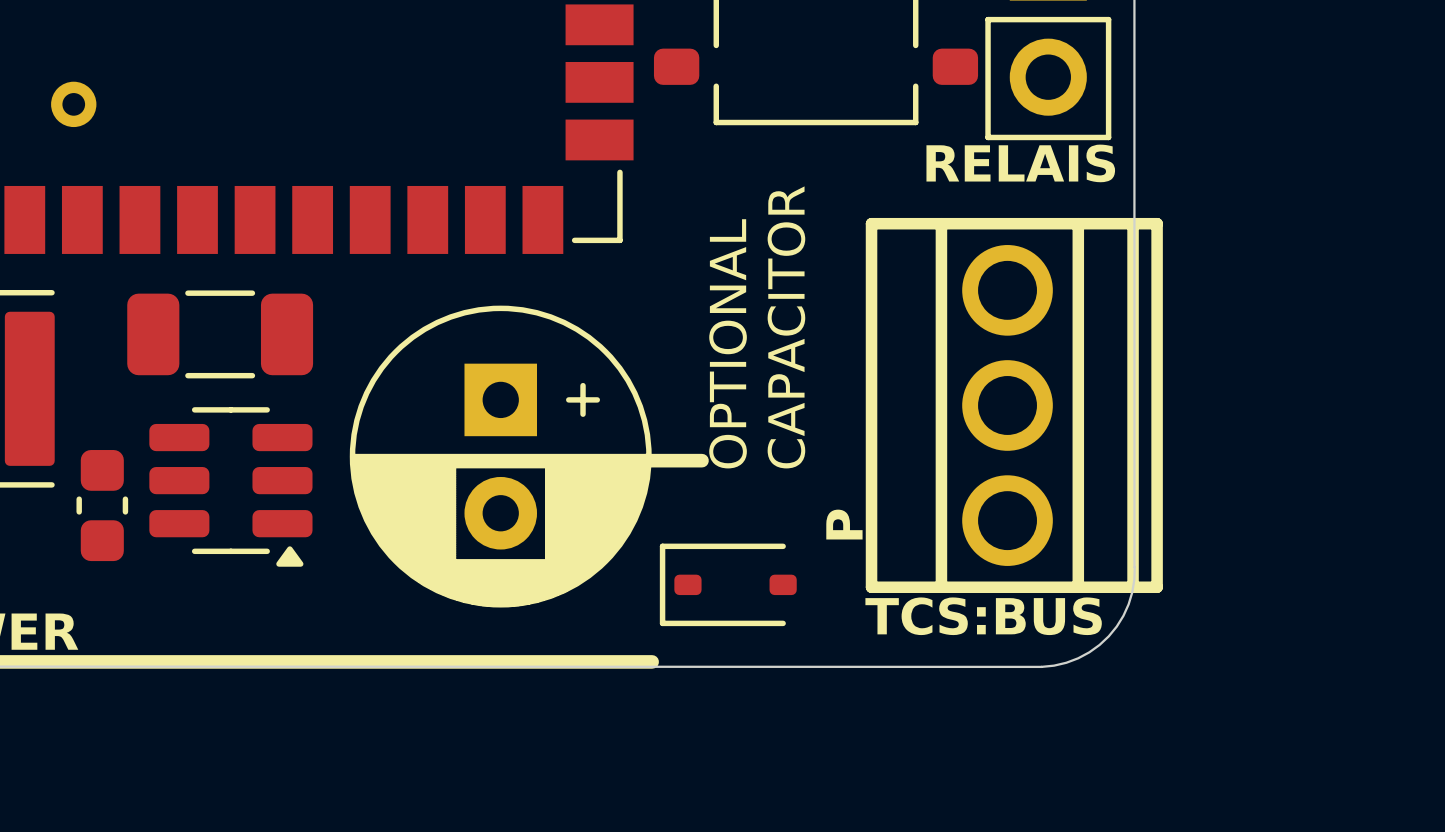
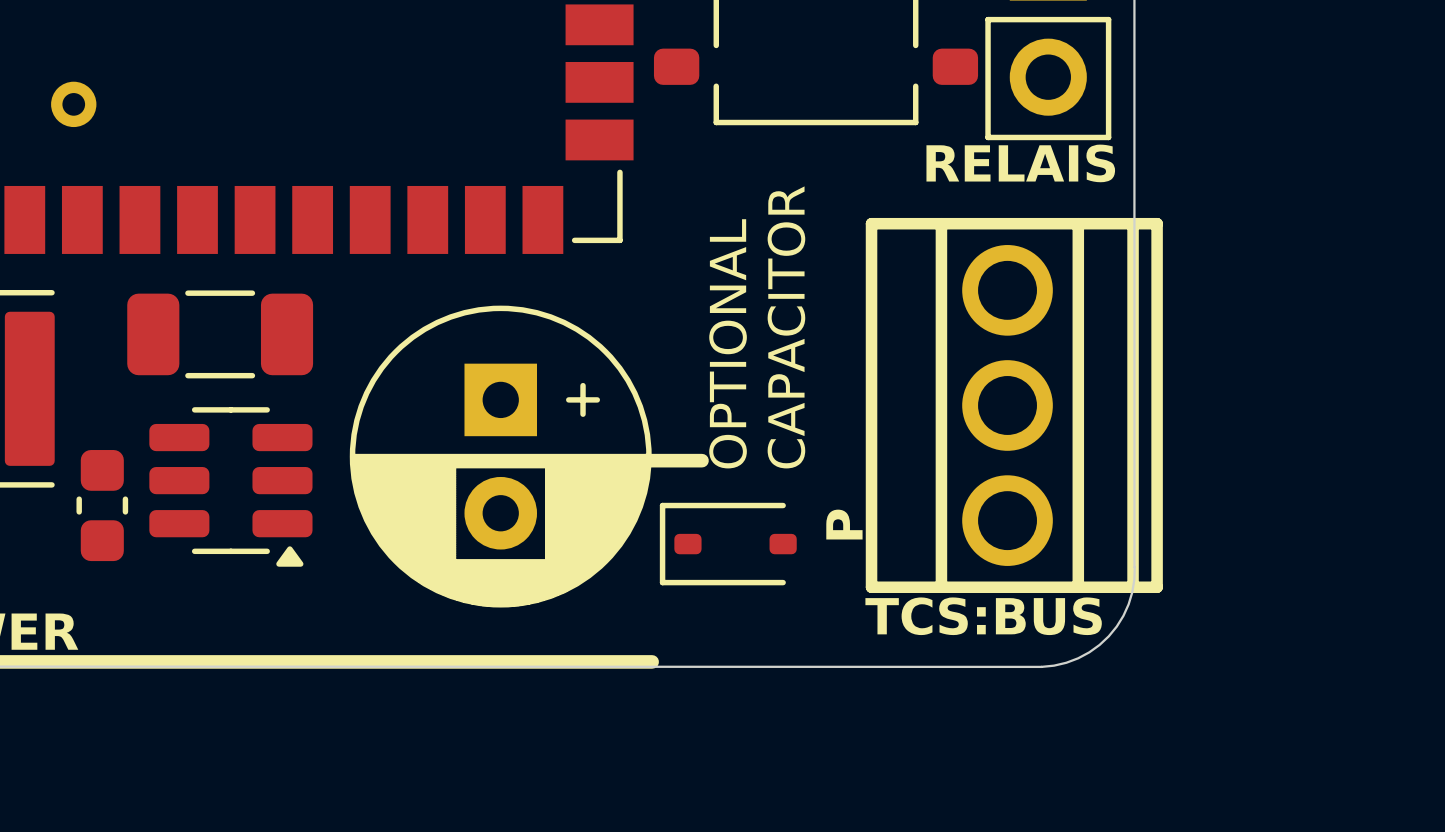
part position: (728, 584) -> (728, 544)

